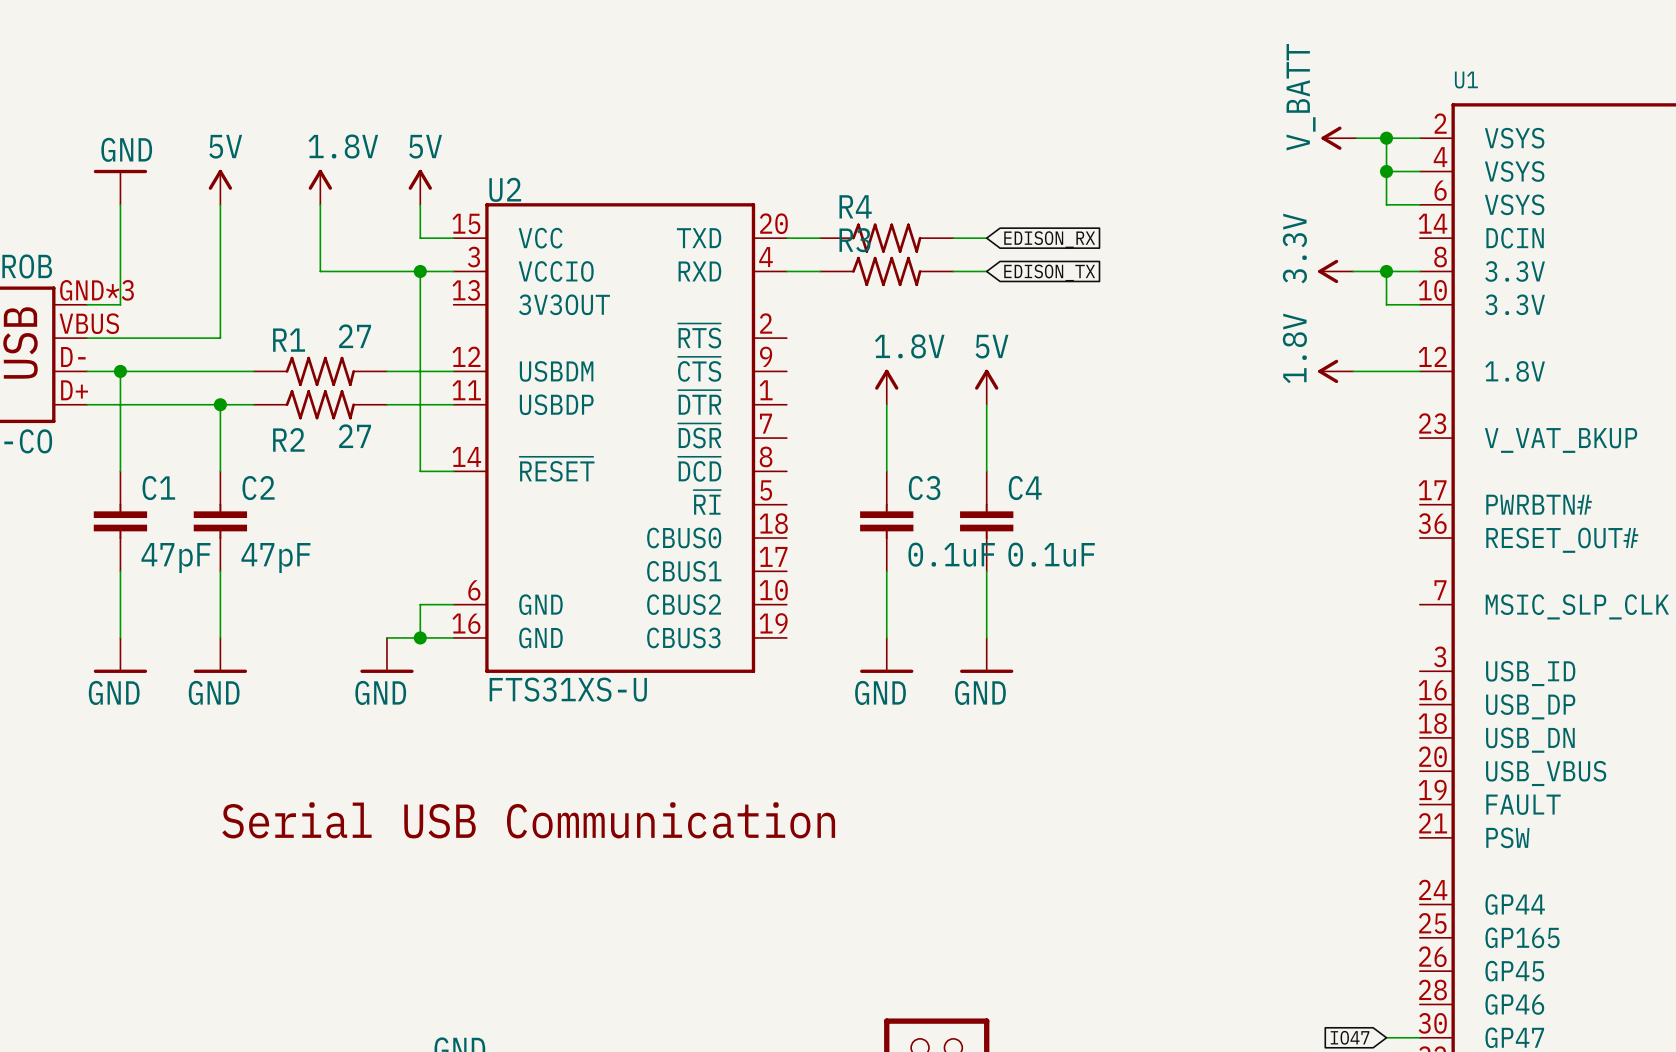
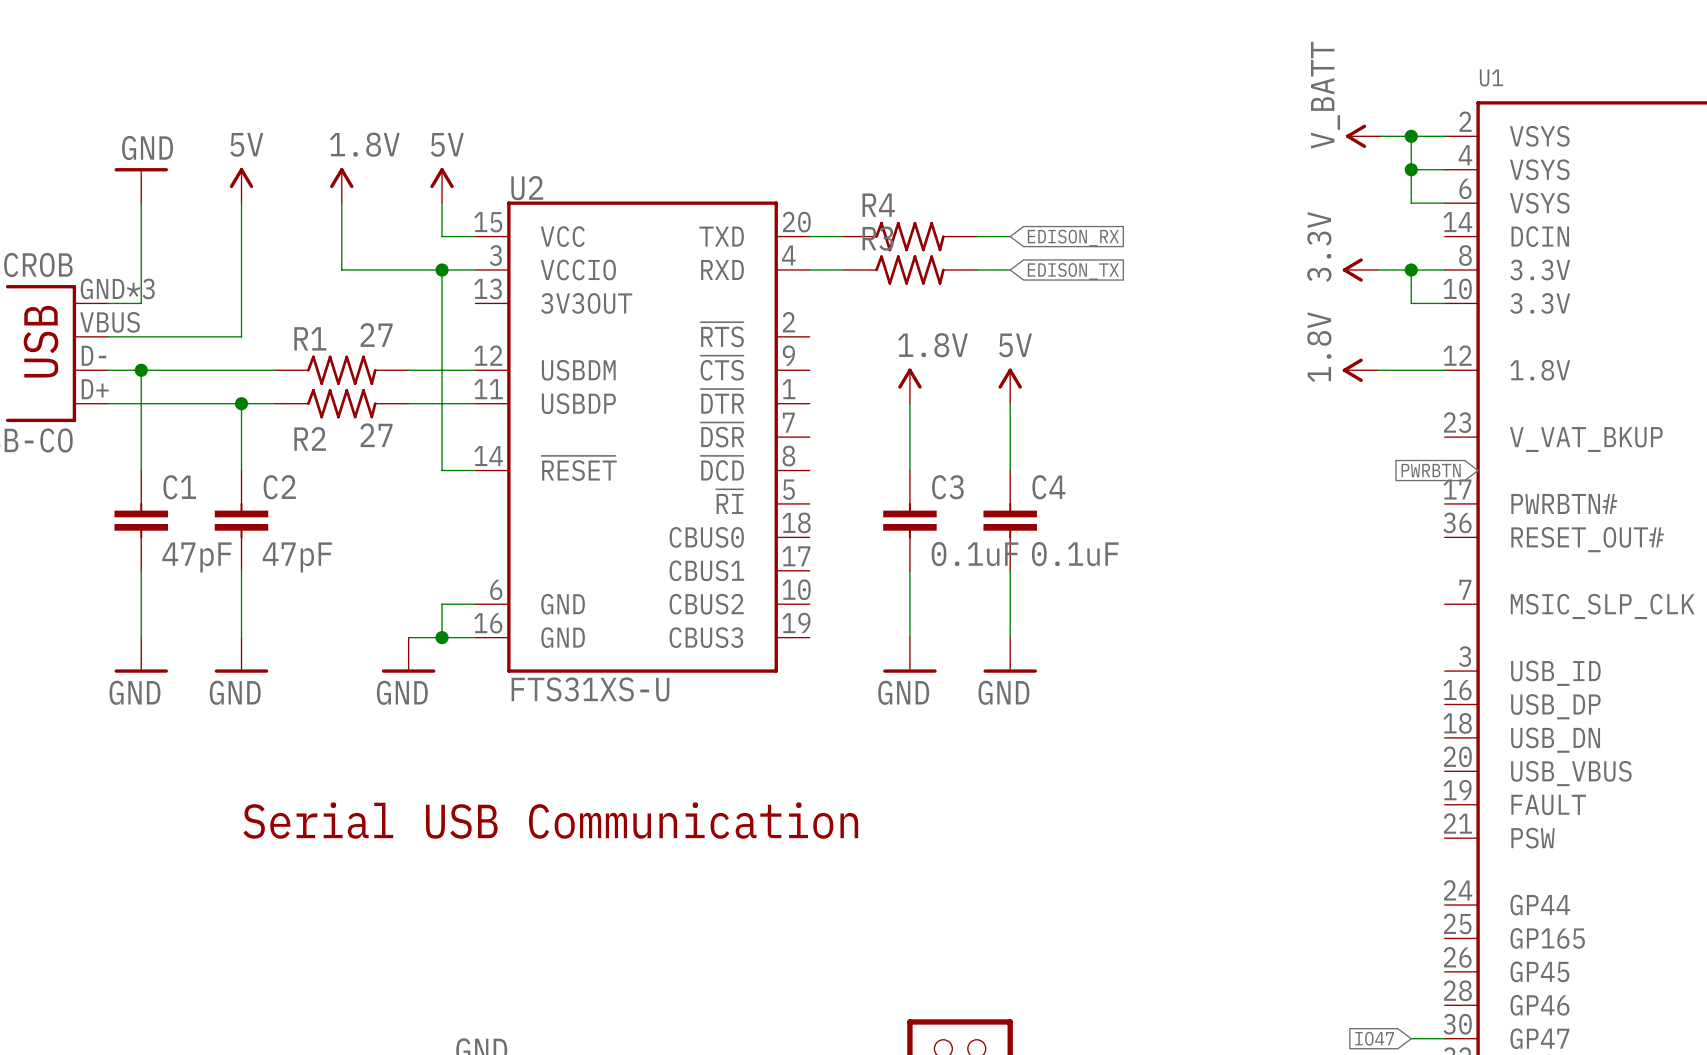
global label: none -> PWRBTN (1431, 470)

